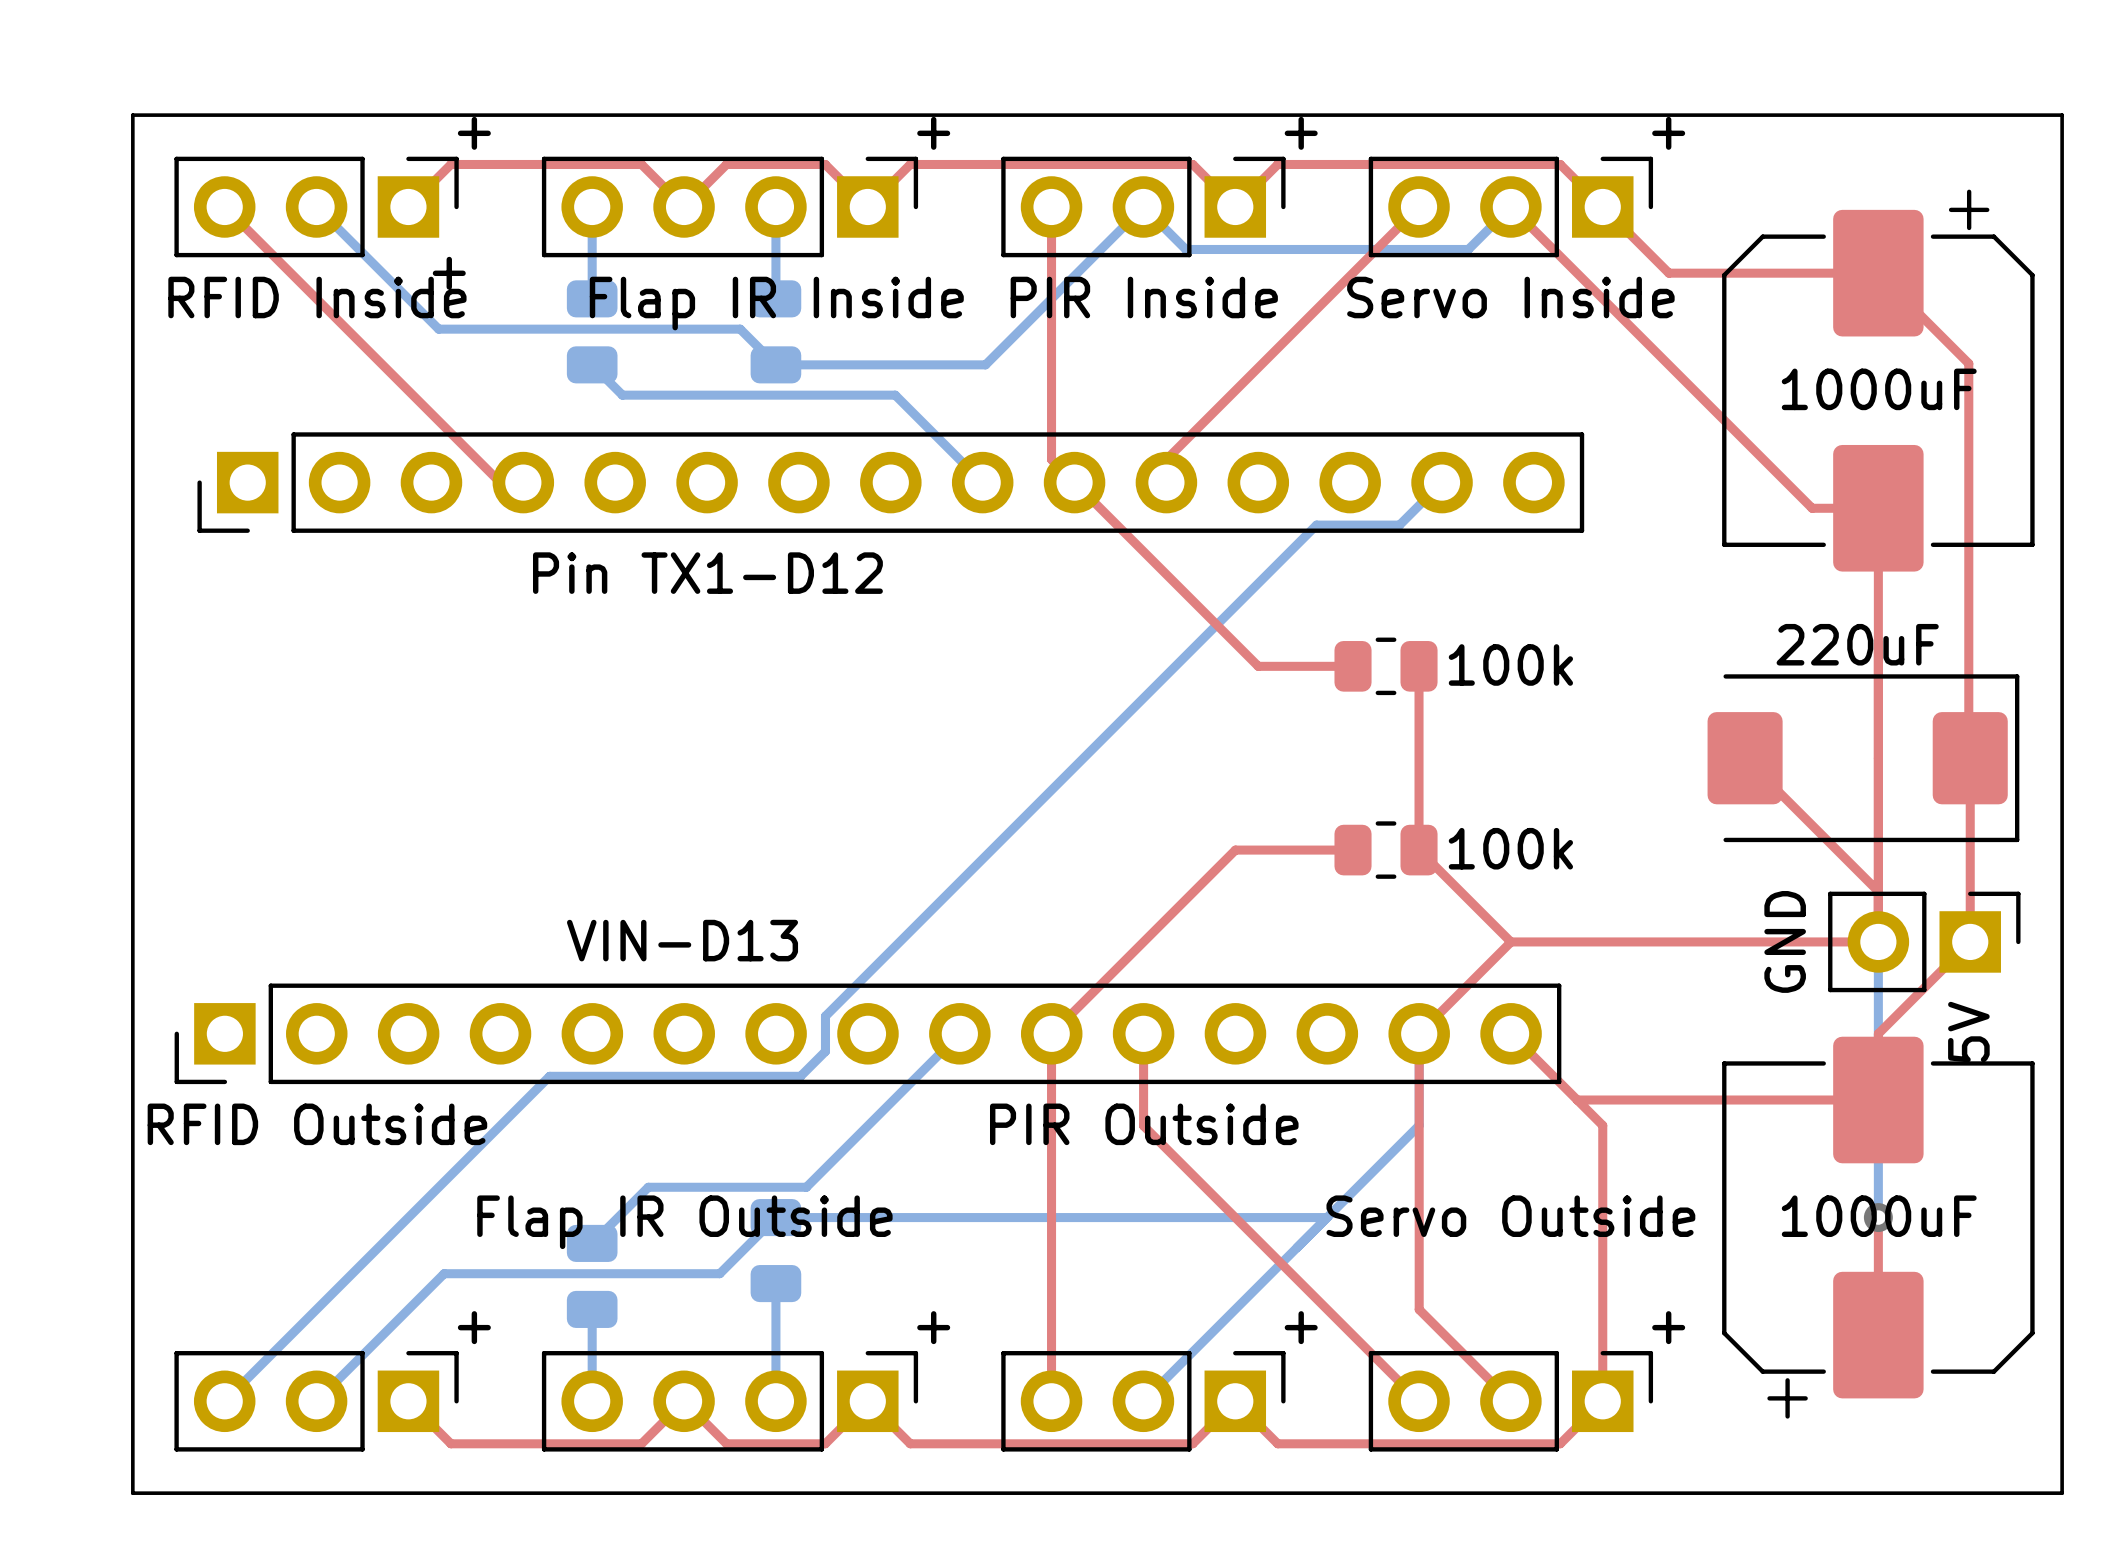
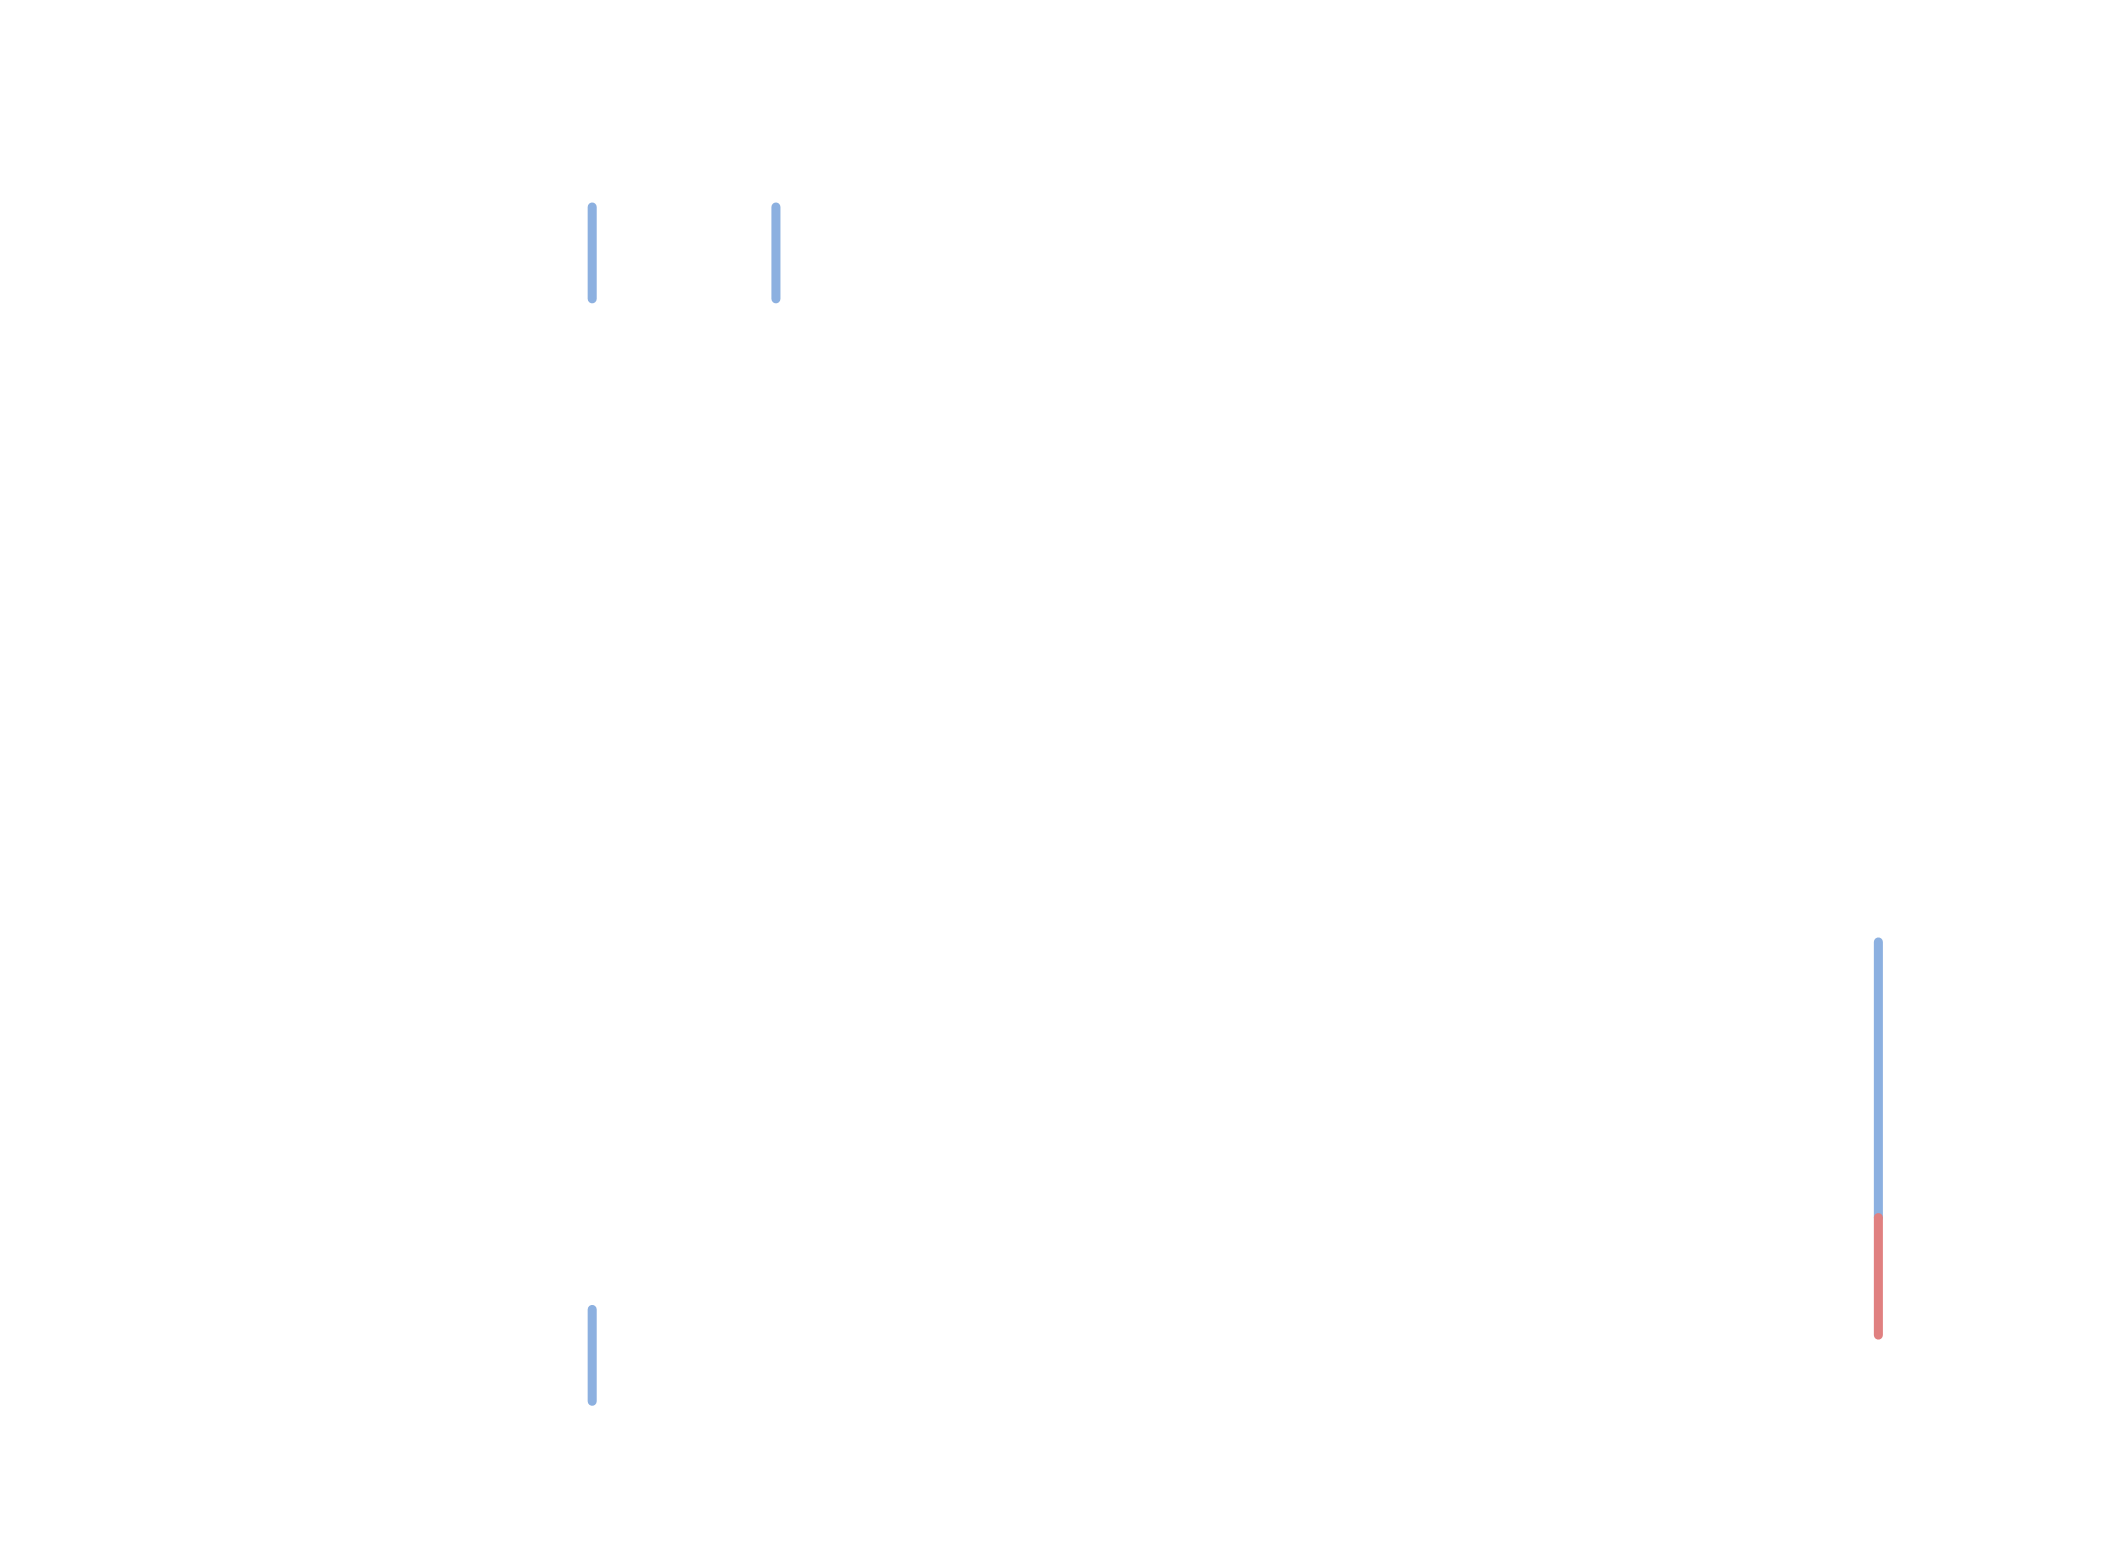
board edge: (132, 115) (2062, 115) (2062, 1493) (132, 1493) (132, 115) -> none
text: + (474, 133) -> none
text: + (933, 133) -> none
text: + (1301, 133) -> none
text: + (1668, 133) -> none
top track: (224, 206) (500, 482) (523, 482) -> none
bottom track: (316, 206) (438, 329) (740, 329) (775, 364) (985, 364) (1143, 206) (1185, 249) (1468, 249) (1510, 206) -> none
part: RFID Inside (316, 206) -> none
top track: (408, 206) (450, 164) (641, 164) (684, 206) (726, 164) (825, 164) (867, 206) (910, 164) (1192, 164) (1235, 206) (1277, 164) (1560, 164) (1668, 273) (1878, 273) (1968, 363) (1970, 941) (1878, 1033) (1878, 1100) (1577, 1100) -> none
part: Flap IR Inside (729, 206) -> none
top track: (1051, 206) (1051, 459) (1258, 666) (1353, 666) -> none
part: PIR Inside (1143, 206) -> none
top track: (1419, 206) (1166, 459) (1166, 482) -> none
top track: (1510, 206) (1812, 508) (1878, 508) (1878, 941) (1511, 941) (1419, 1033) (1419, 1309) (1510, 1401) -> none
part: Servo Inside (1510, 206) -> none
text: + (449, 273) -> none
part: (592, 331) -> none
part: (775, 331) -> none
bottom track: (592, 364) (622, 395) (895, 395) (982, 482) -> none
part: (1878, 380) -> none
text: 1000uF (1879, 389) -> none
part: Pin TX1-D12 (890, 482) -> none
bottom track: (1442, 482) (1399, 525) (1316, 525) (825, 1016) (825, 1051) (800, 1076) (549, 1076) (224, 1401) -> none
part: 100k (1386, 666) -> none
top track: (1419, 666) (1419, 850) (1510, 942) -> none
top track: (1745, 758) (1878, 891) -> none
part: 220uF (1863, 758) -> none
top track: (1353, 850) (1235, 850) (1051, 1033) (1051, 1401) -> none
part: 100k (1386, 850) -> none
text: GND (1785, 941) -> none
part: 5V (1924, 941) -> none
part: VIN-D13 (867, 1033) -> none
bottom track: (959, 1033) (806, 1187) (648, 1187) (592, 1243) -> none
top track: (1143, 1033) (1143, 1125) (1419, 1401) -> none
bottom track: (1419, 1033) (1419, 1125) (1143, 1401) -> none
top track: (1511, 1033) (1602, 1125) (1602, 1401) (1560, 1443) (1277, 1443) (1235, 1401) (1192, 1443) (910, 1443) (867, 1401) (825, 1443) (726, 1443) (684, 1401) (641, 1443) (450, 1443) (408, 1401) -> none
text: 1000uF (1879, 1216) -> none
bottom track: (1327, 1217) (775, 1217) (719, 1273) (444, 1273) (316, 1401) -> none
via: (1878, 1217) -> none
part: (1878, 1227) -> none
part: (775, 1250) -> none
part: (592, 1276) -> none
bottom track: (775, 1283) (775, 1401) -> none
text: + (474, 1327) -> none
text: + (933, 1327) -> none
text: + (1301, 1327) -> none
text: + (1668, 1327) -> none
part: RFID Outside (316, 1401) -> none
part: Flap IR Outside (729, 1401) -> none
part: PIR Outside (1143, 1401) -> none
part: Servo Outside (1510, 1401) -> none

